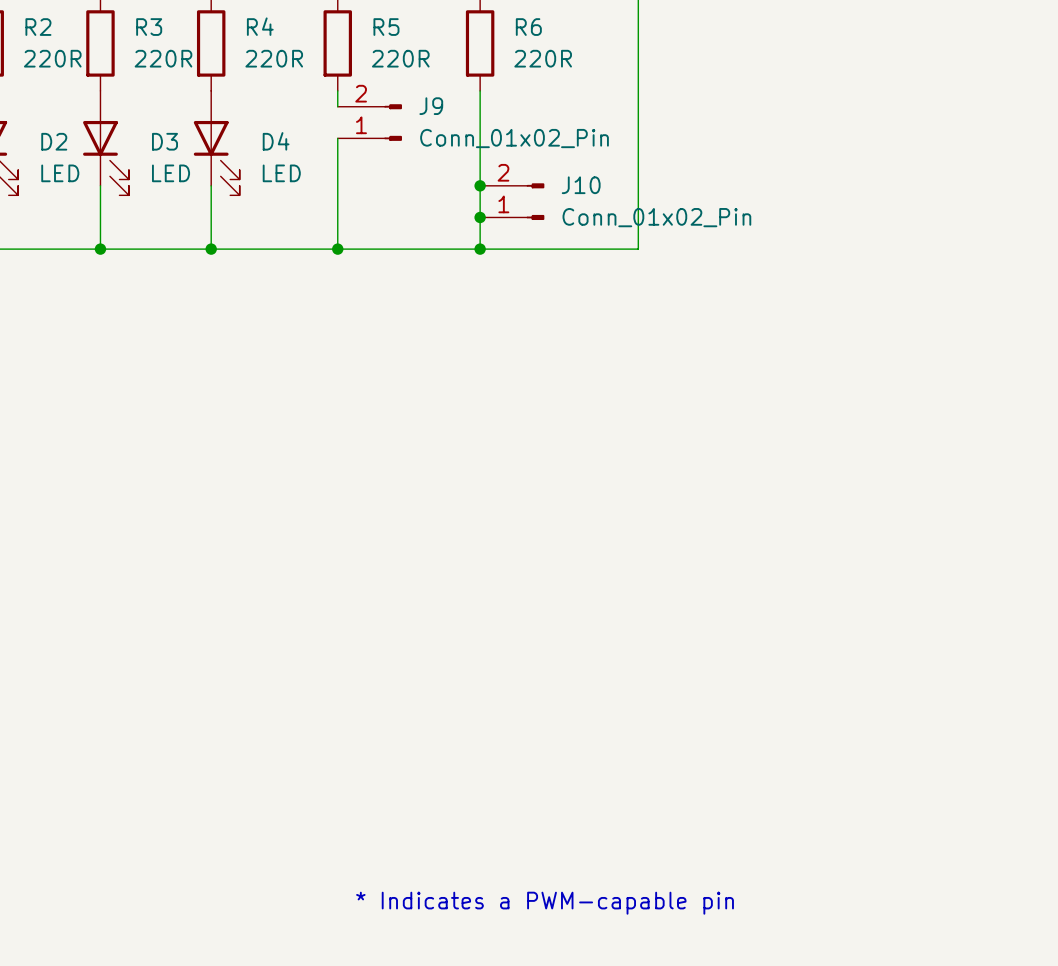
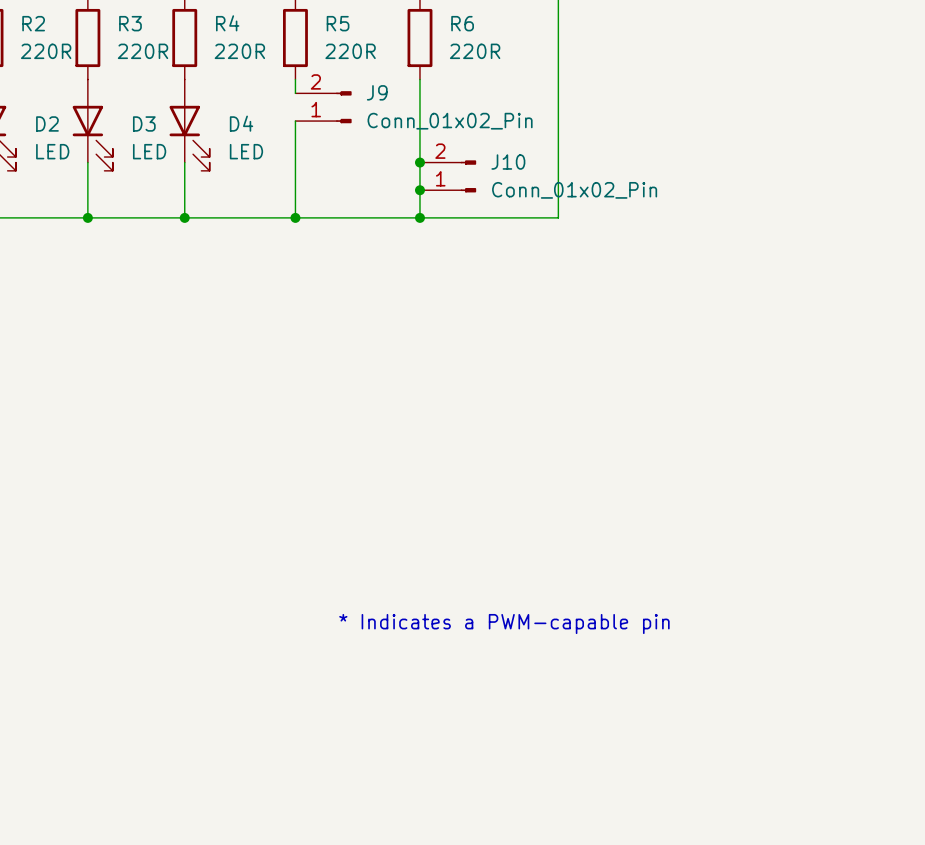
text position: * Indicates a PWM-capable pin (545, 903) -> * Indicates a PWM-capable pin (504, 624)

